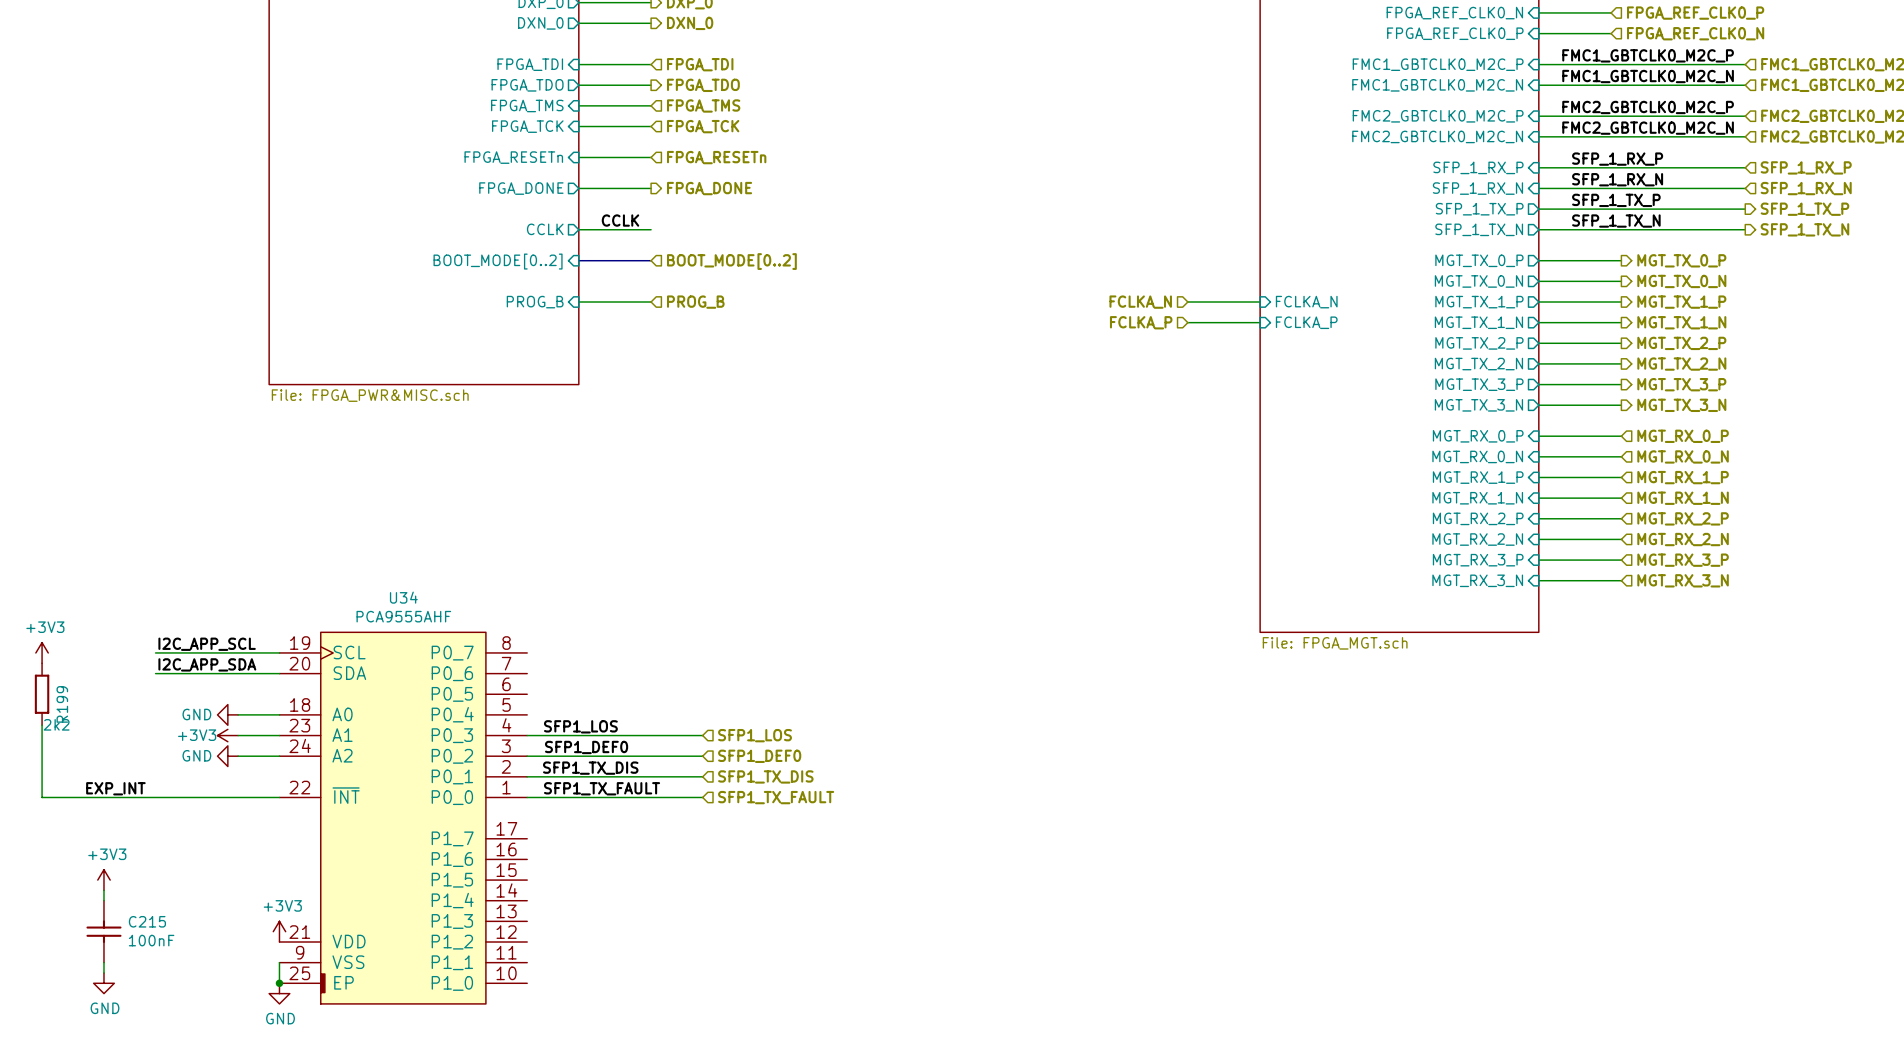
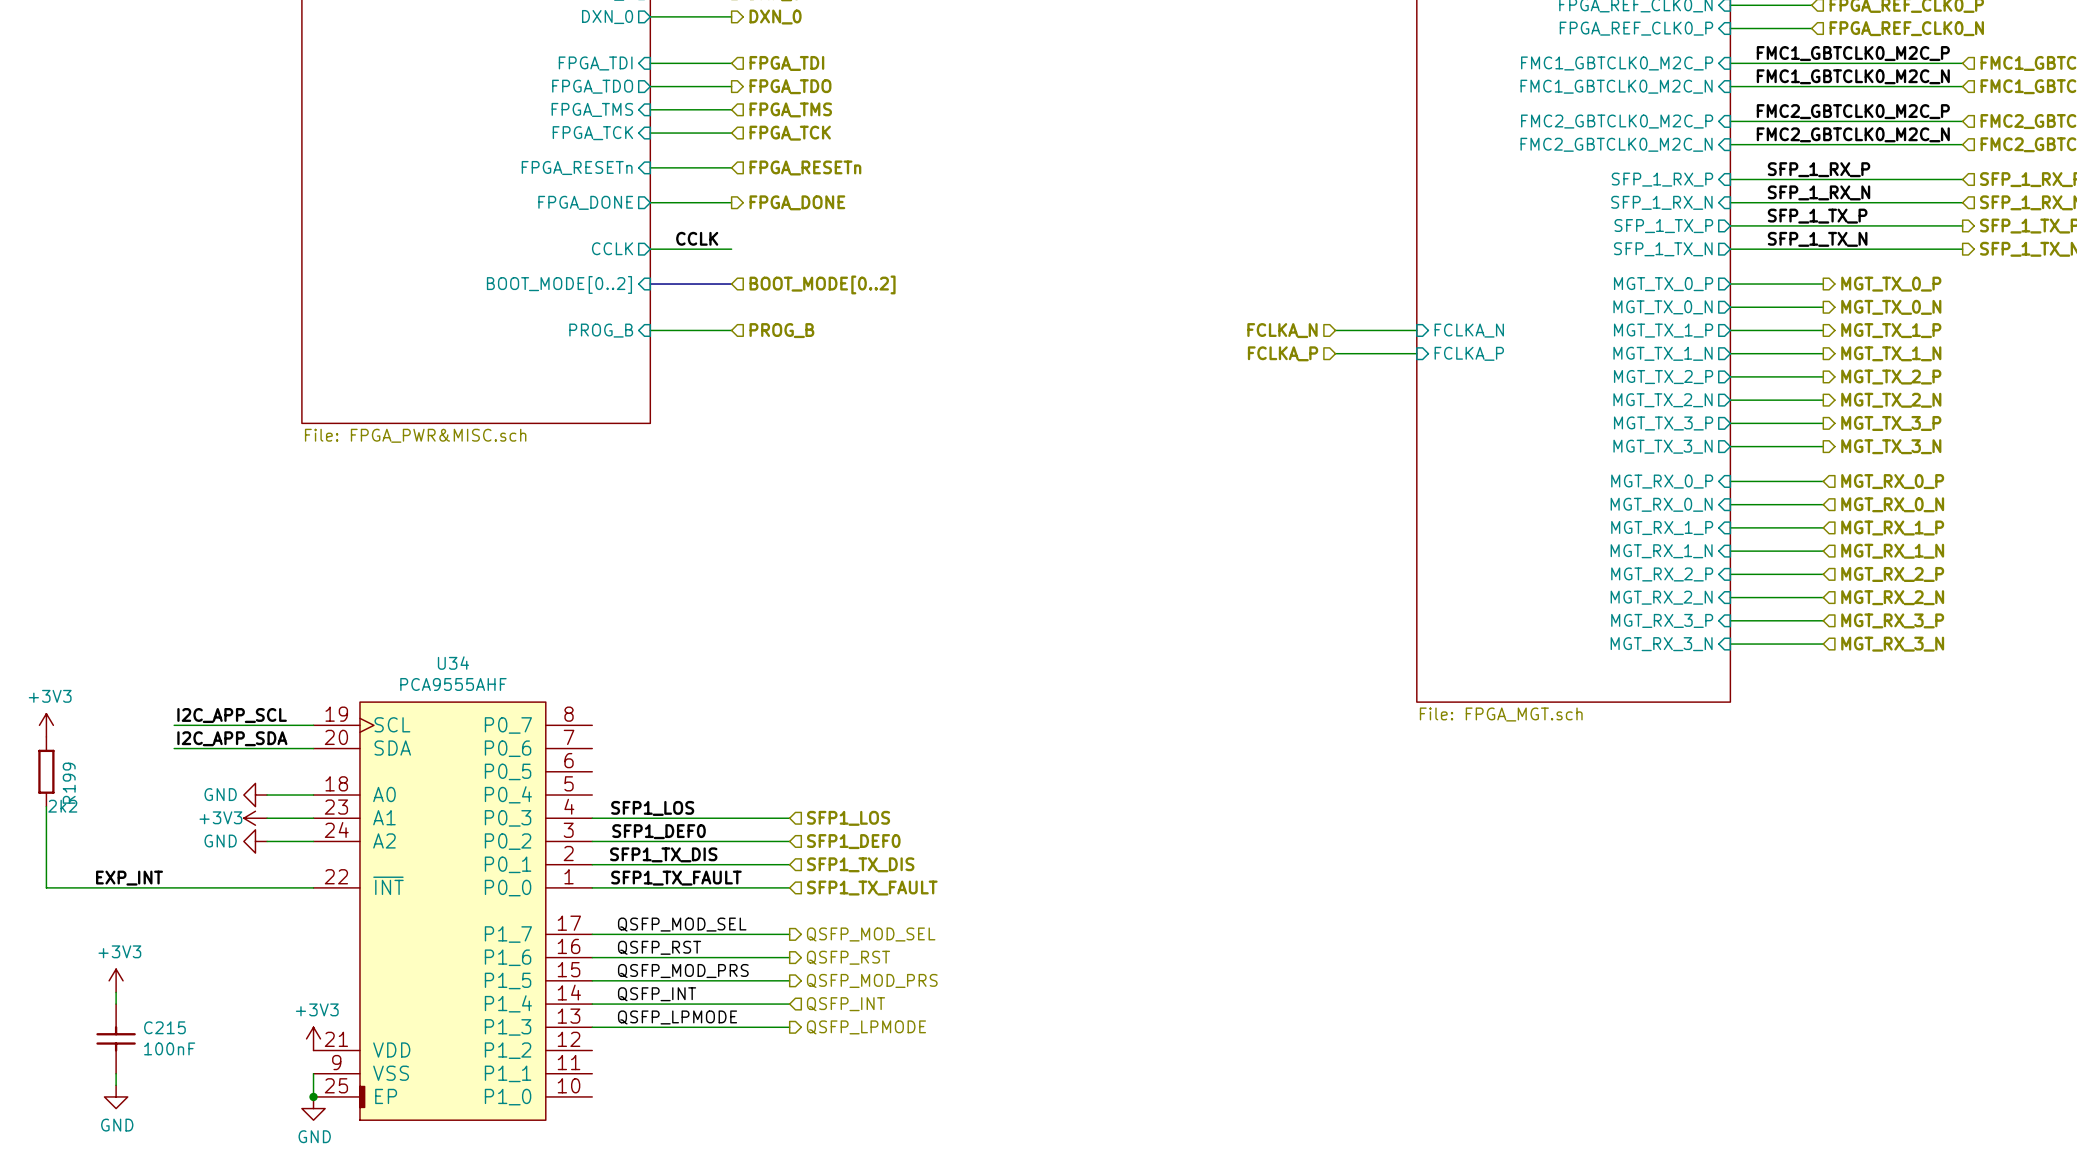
label: none -> QSFP_MOD_SEL (682, 924)
wire: none -> (592, 934) (789, 934)
hierarchical label: none -> QSFP_MOD_SEL (871, 934)
label: none -> QSFP_RST (659, 947)
wire: none -> (592, 957) (789, 957)
hierarchical label: none -> QSFP_RST (848, 957)
label: none -> QSFP_MOD_PRS (683, 971)
wire: none -> (592, 980) (789, 980)
hierarchical label: none -> QSFP_MOD_PRS (872, 980)
label: none -> QSFP_INT (657, 994)
wire: none -> (592, 1004) (789, 1004)
hierarchical label: none -> QSFP_INT (846, 1004)
label: none -> QSFP_LPMODE (677, 1017)
wire: none -> (592, 1027) (789, 1027)
hierarchical label: none -> QSFP_LPMODE (866, 1027)

